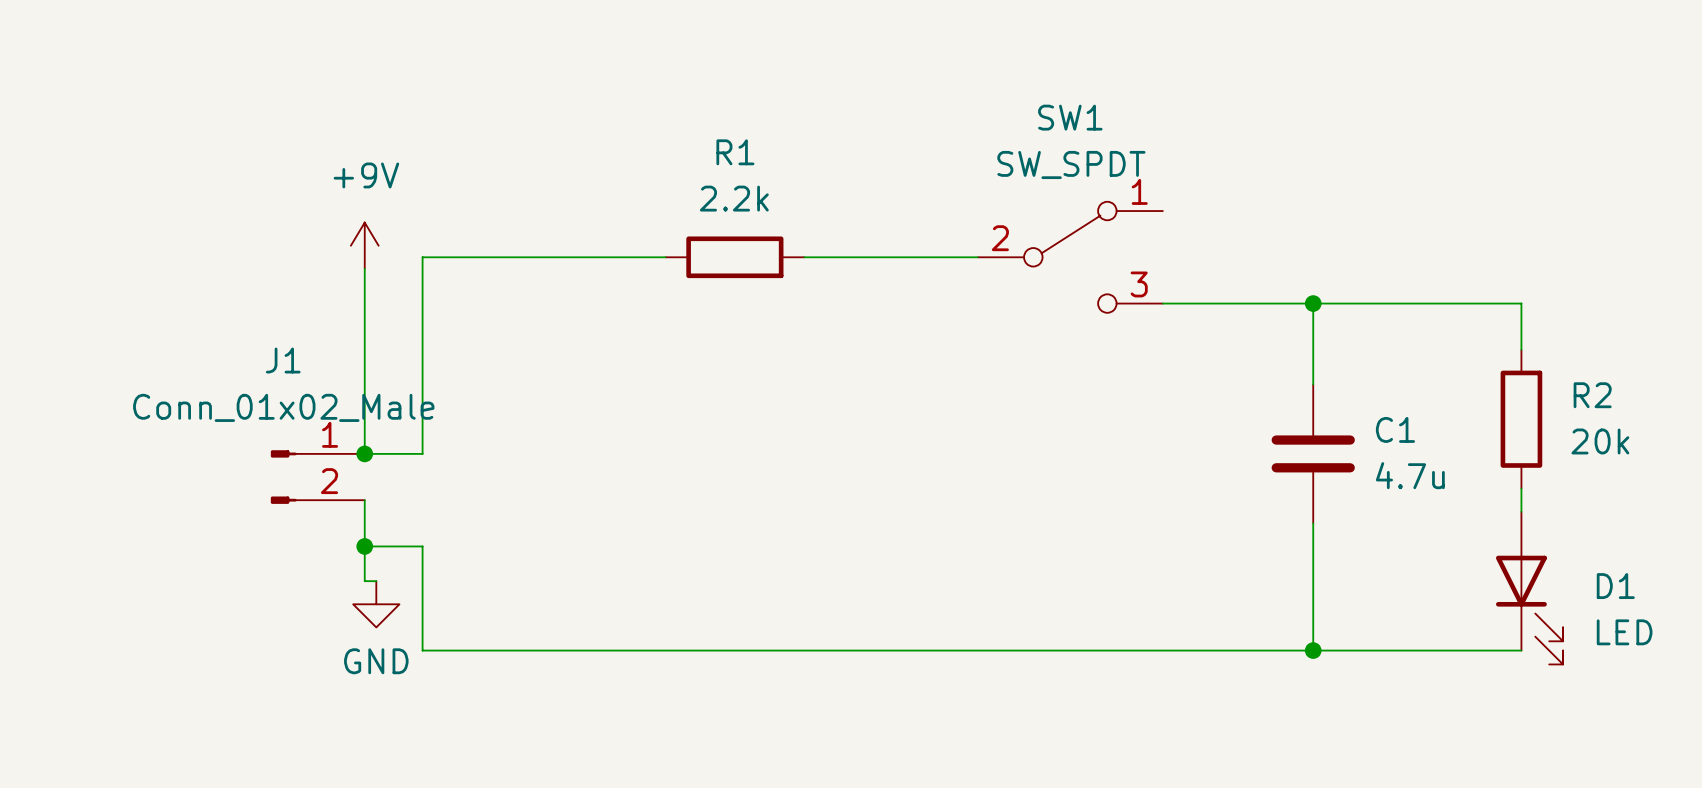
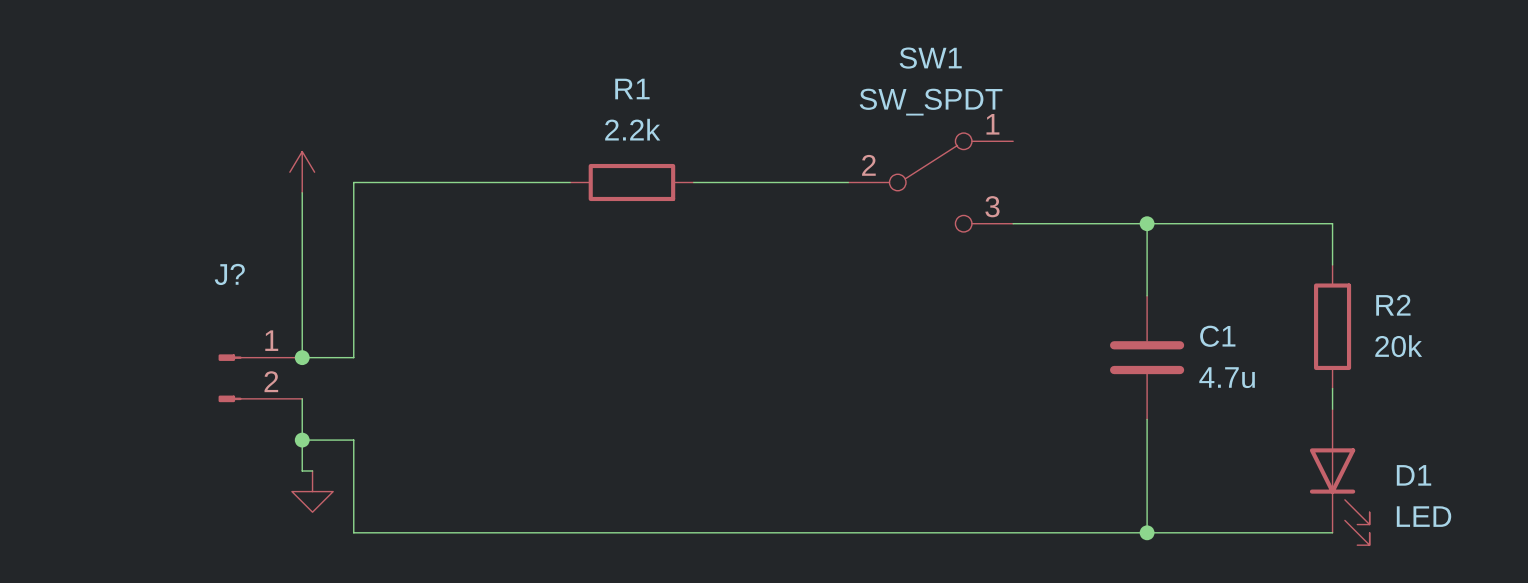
power symbol text: +9V (366, 175) -> none
J1 name: J1 (283, 360) -> J? (229, 274)
J1 value: Conn_01x02_Male (283, 407) -> none
power symbol text: GND (376, 661) -> none

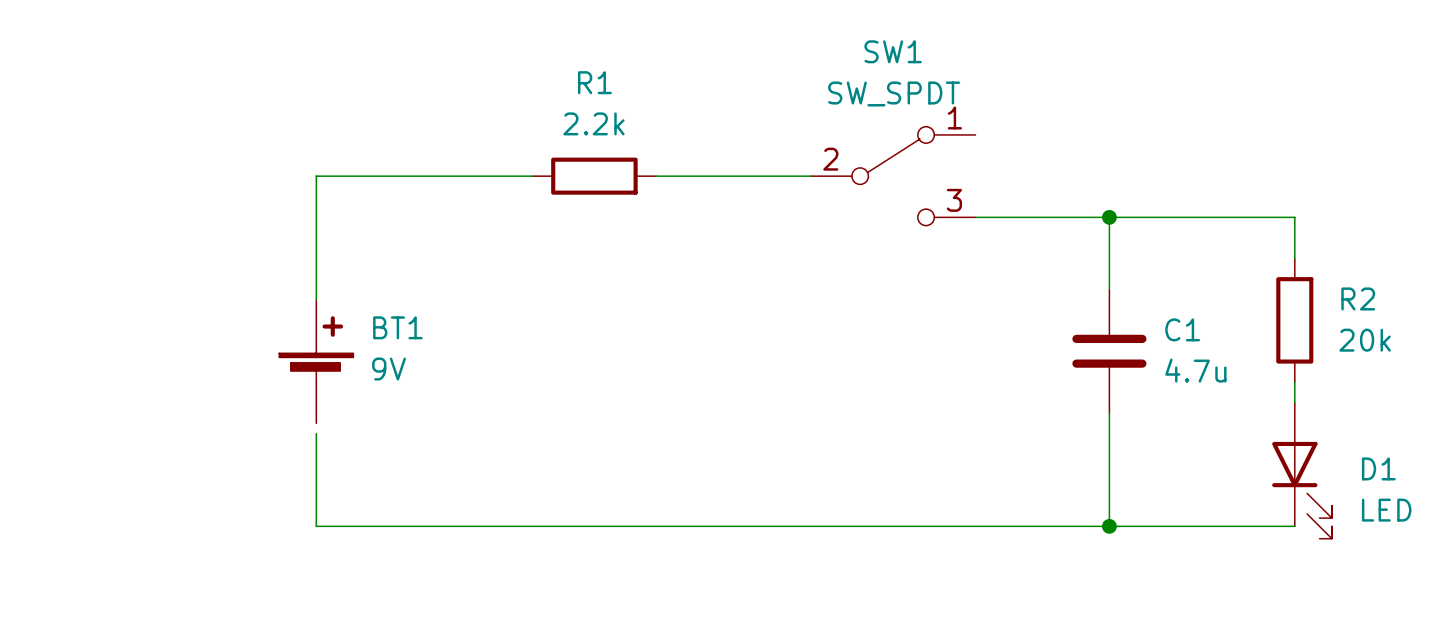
power symbol: (302, 172) -> none
wire: (302, 192) (302, 357) (353, 357) (353, 306) -> none
junction: (302, 357) -> none
BT1: none -> 9V (316, 361)
J?: (260, 378) -> none
wire: (302, 398) (302, 470) (312, 470) -> none
wire: (302, 440) (353, 440) -> none
junction: (302, 440) -> none
power symbol: (312, 491) -> none

